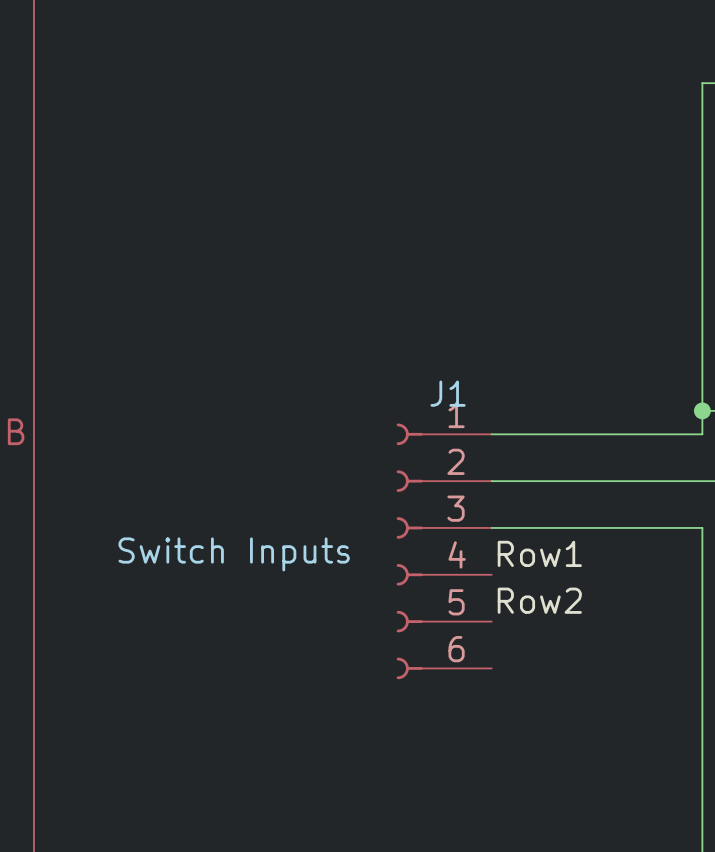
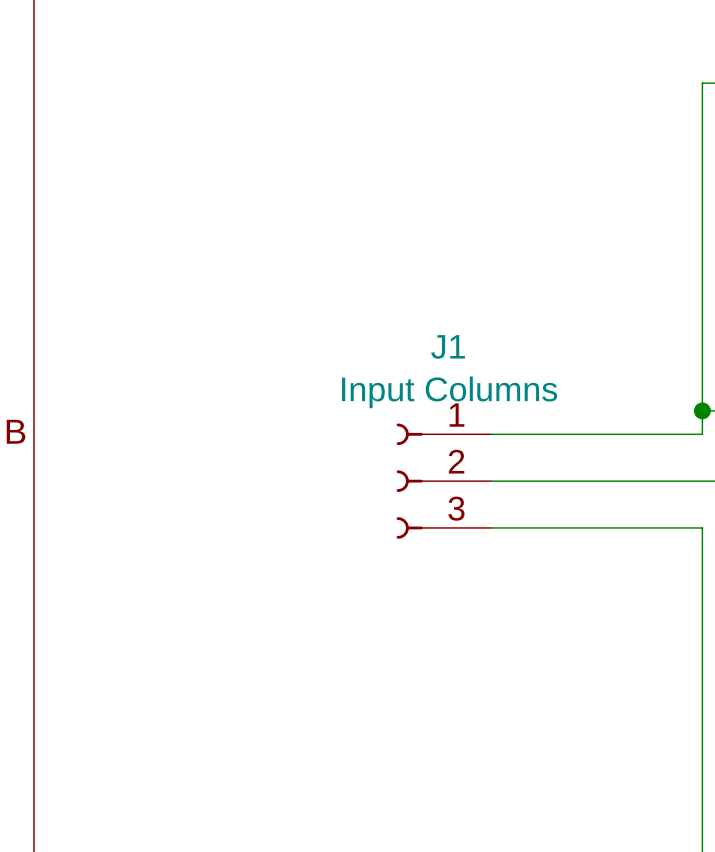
J1 symbol: [396, 423, 492, 680] -> [396, 423, 492, 539]
label: Row1 (539, 553) -> none
J1 value: Switch Inputs (234, 554) -> Input Columns (449, 392)
label: Row2 (539, 600) -> none

